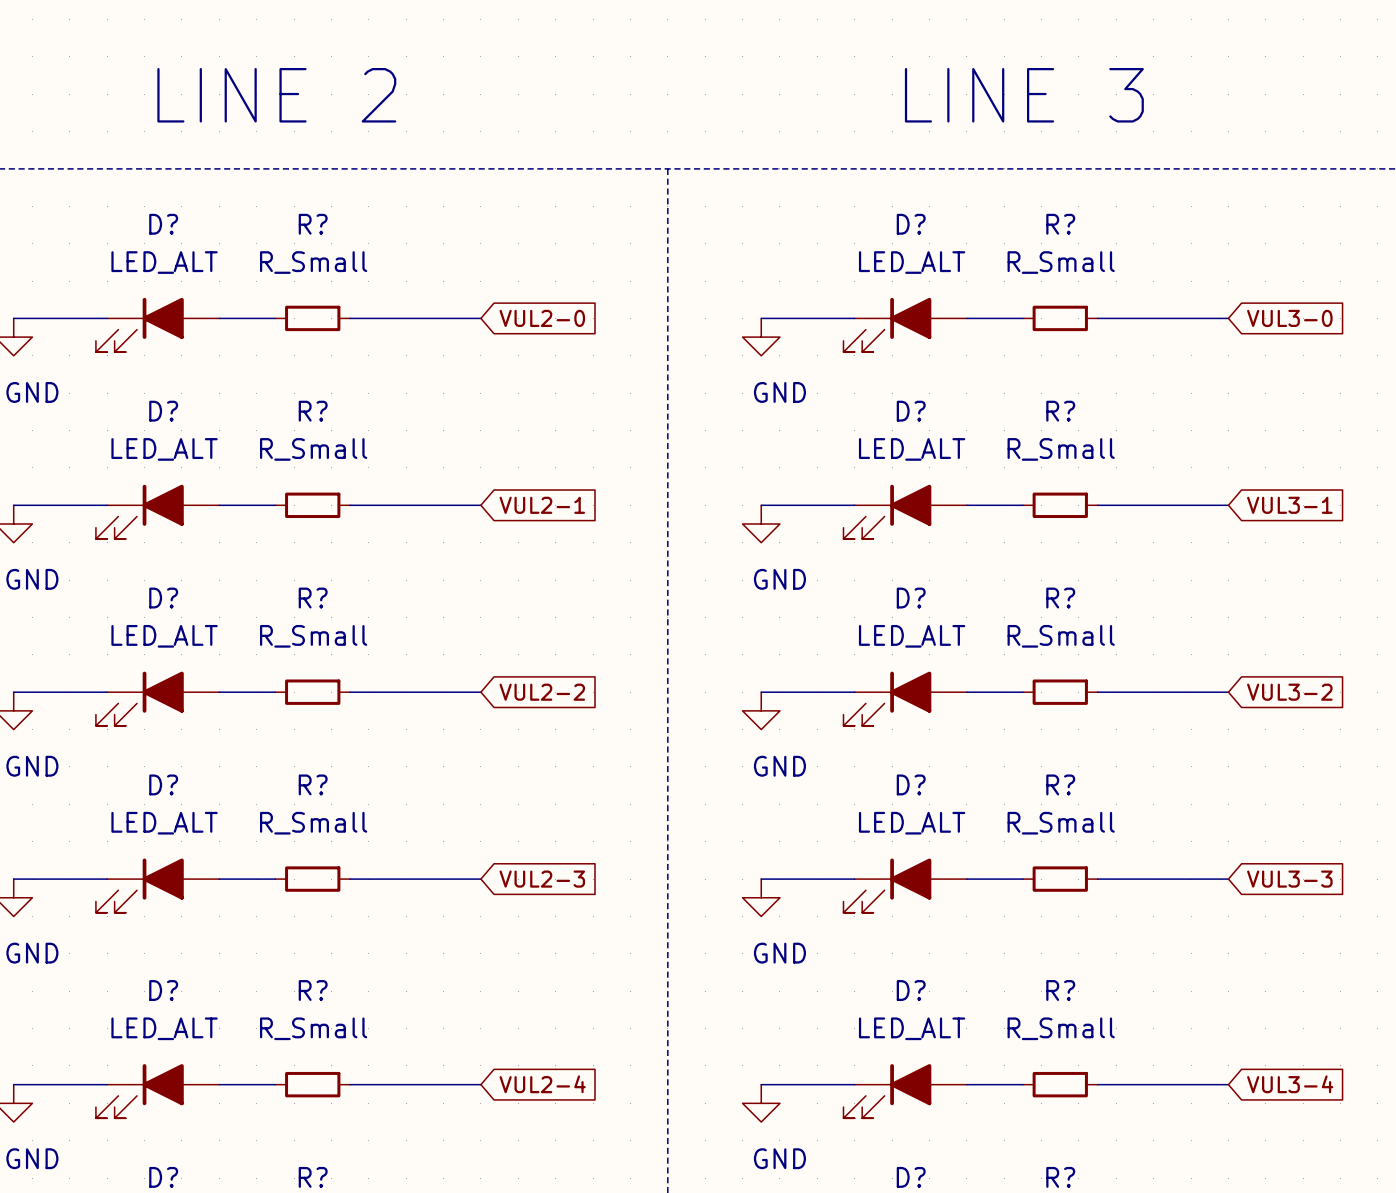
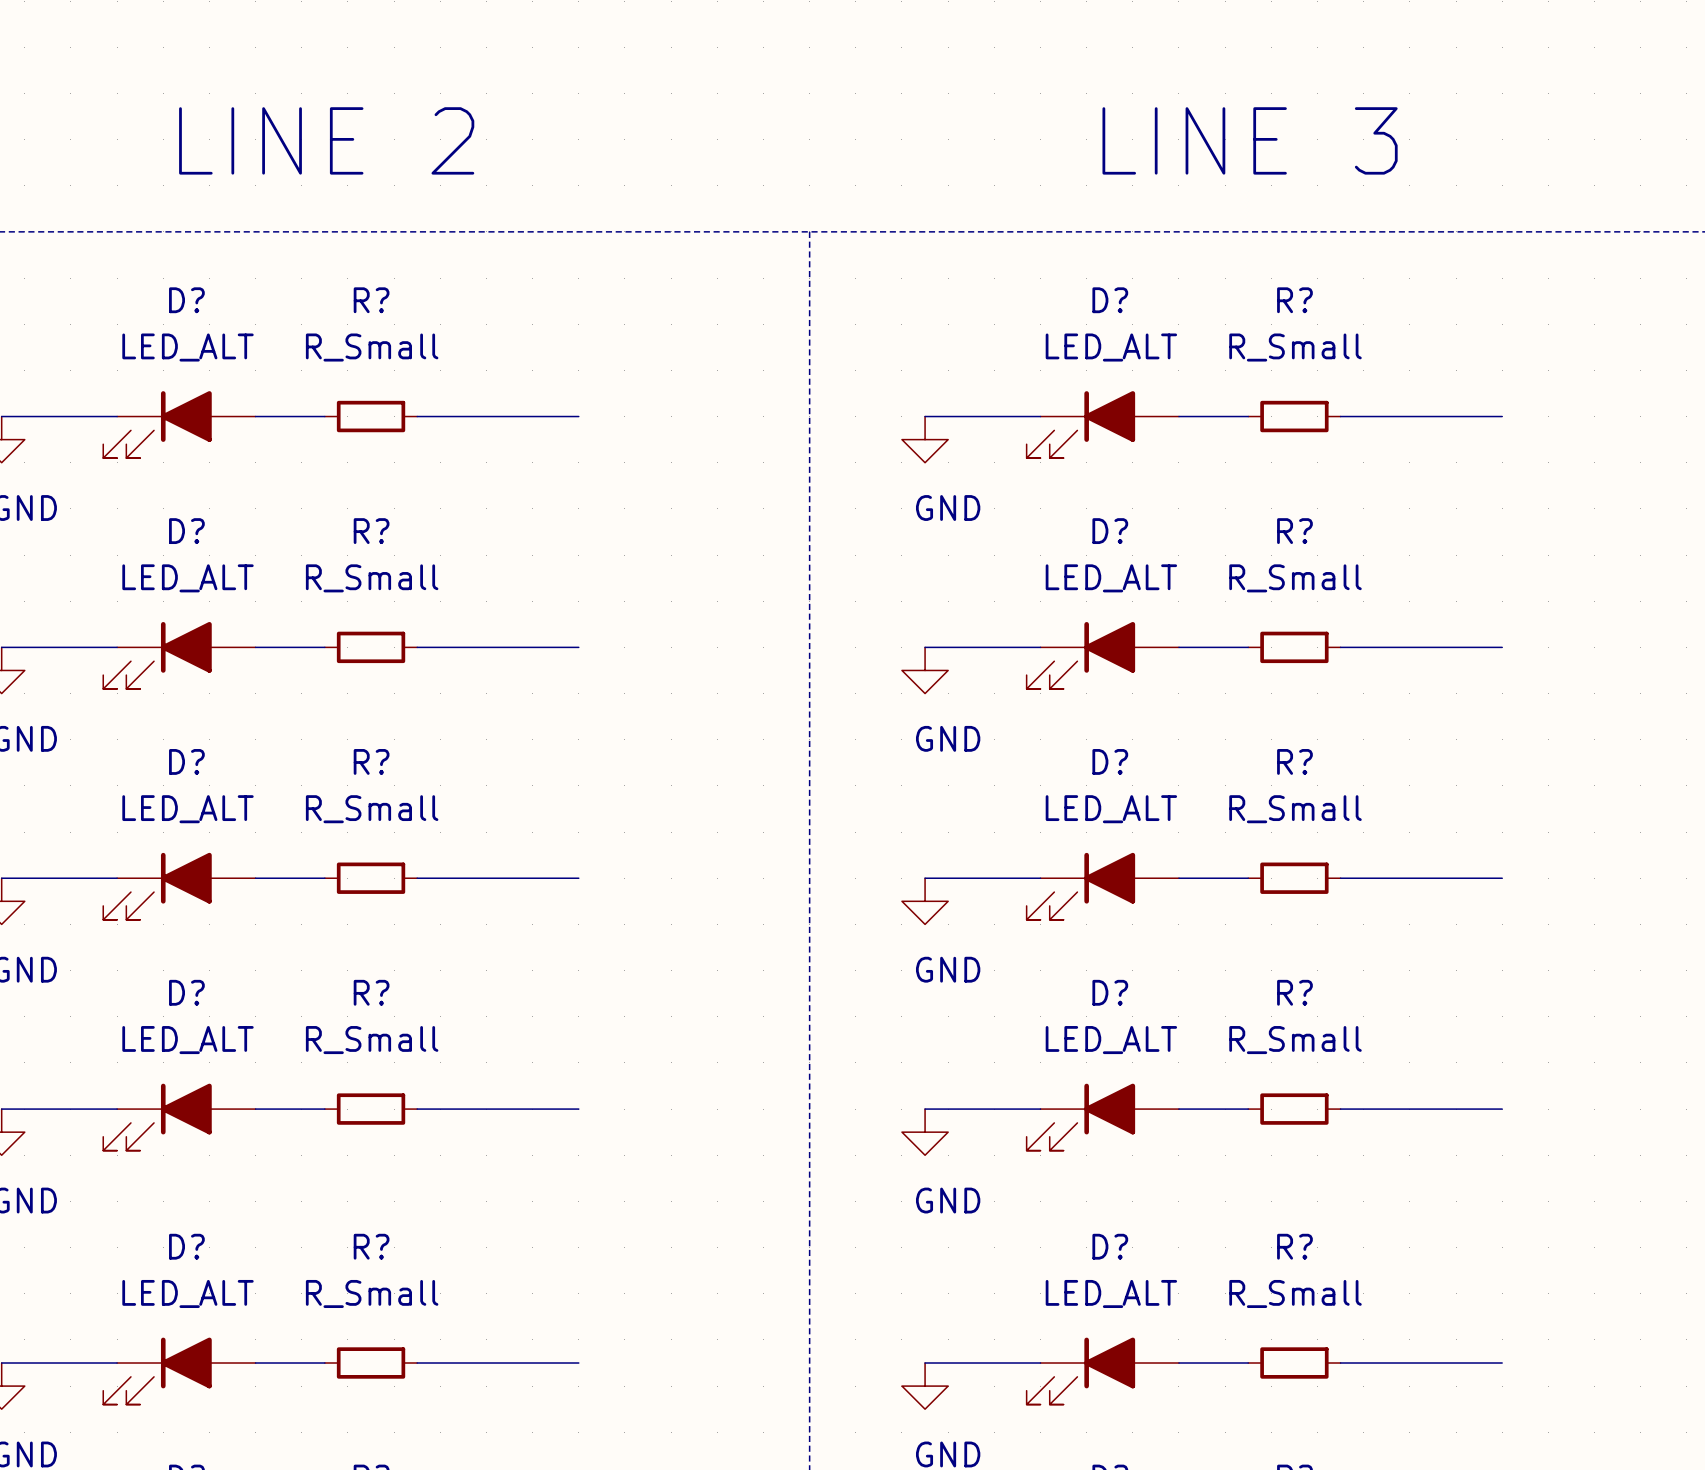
global label: VUL2-0 (542, 318) -> none
global label: VUL3-0 (1289, 318) -> none
global label: VUL2-1 (542, 505) -> none
global label: VUL3-1 (1289, 505) -> none
global label: VUL2-2 (542, 692) -> none
global label: VUL3-2 (1289, 692) -> none
global label: VUL2-3 (542, 879) -> none
global label: VUL3-3 (1289, 879) -> none
global label: VUL2-4 (542, 1084) -> none
global label: VUL3-4 (1290, 1084) -> none

